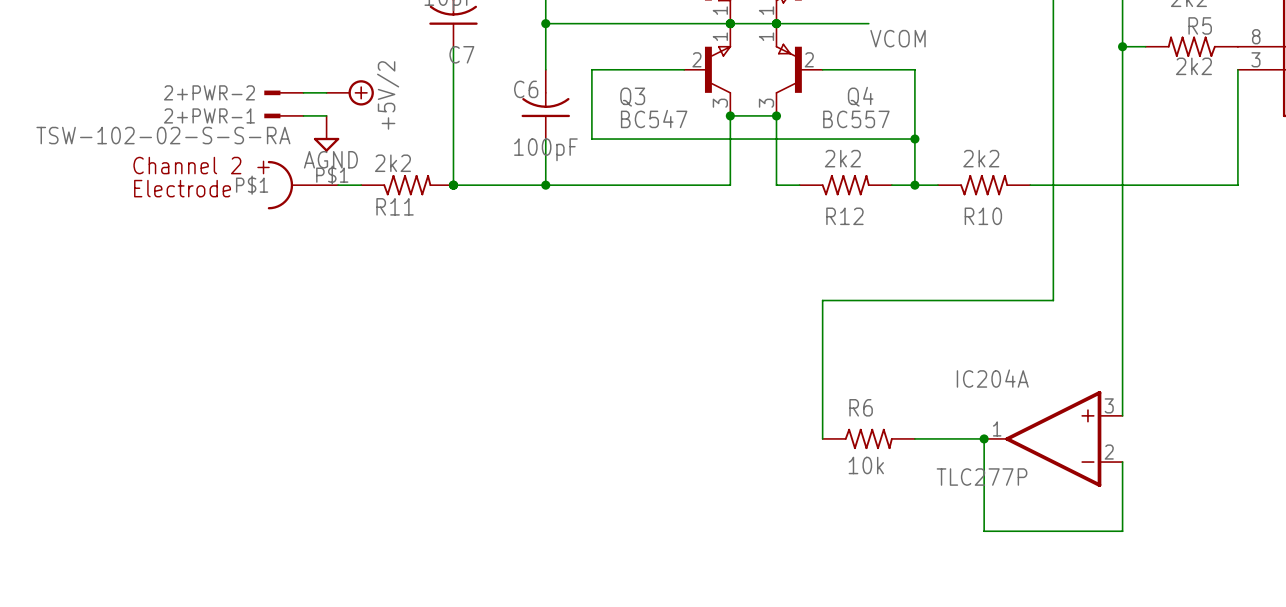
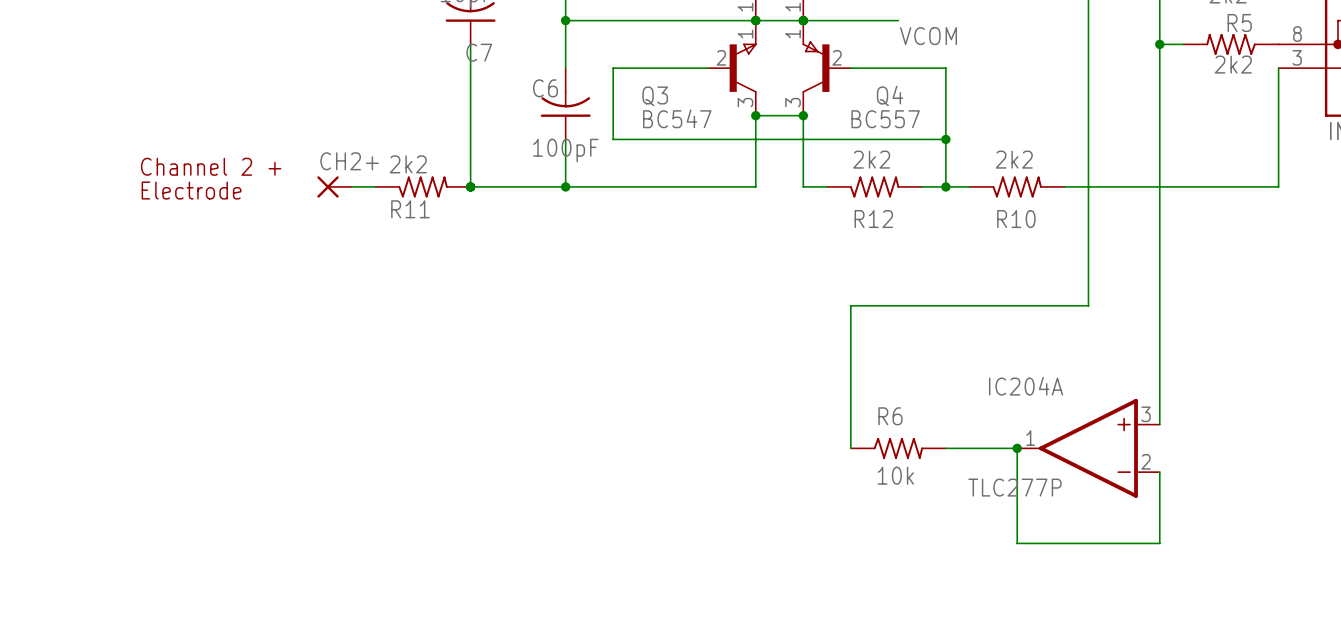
2+PWR-2: (283, 92) -> none
wire: (303, 92) (326, 92) -> none
power symbol: +5V/2 (350, 92) -> none
2+PWR-1: TSW-102-02-S-S-RA (283, 115) -> none
wire: (303, 115) (326, 115) -> none
power symbol: AGND (326, 133) -> none
part: (302, 185) -> none
CH2+: none -> (334, 186)

